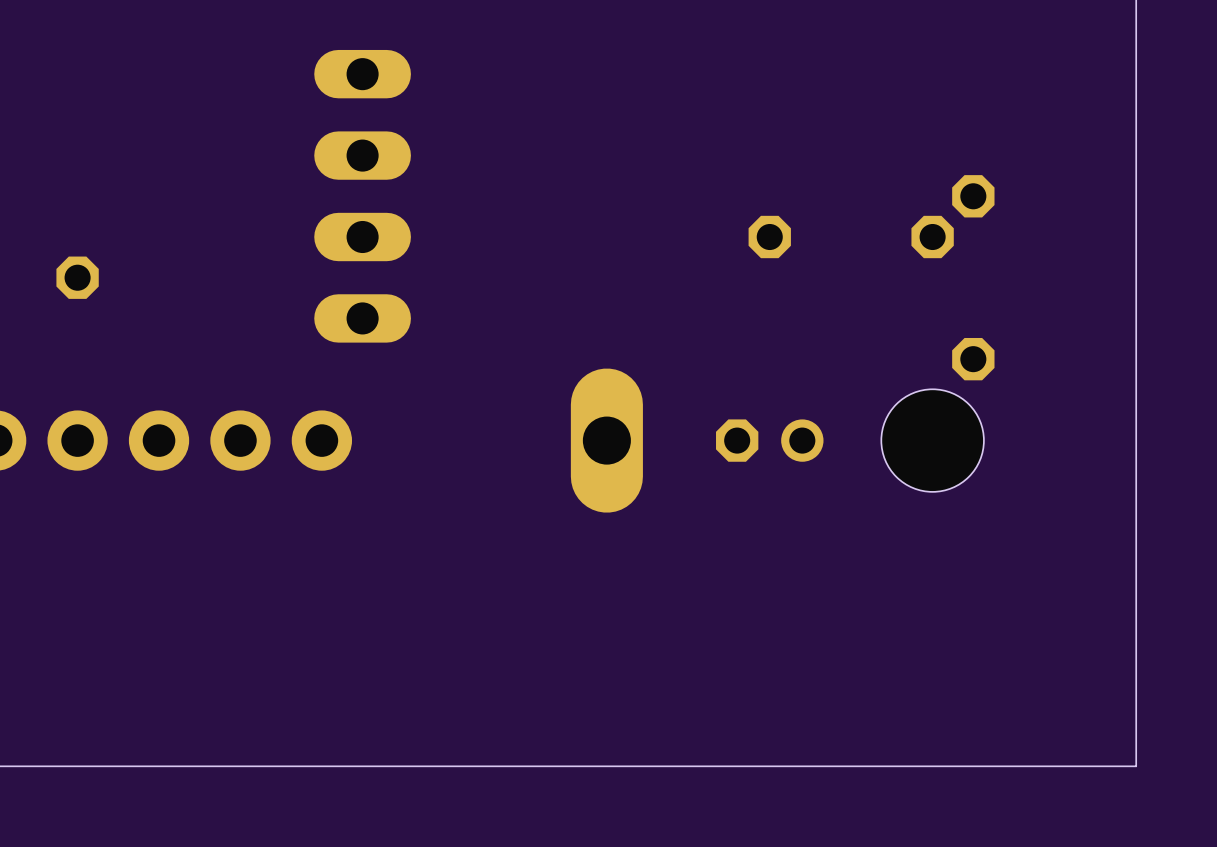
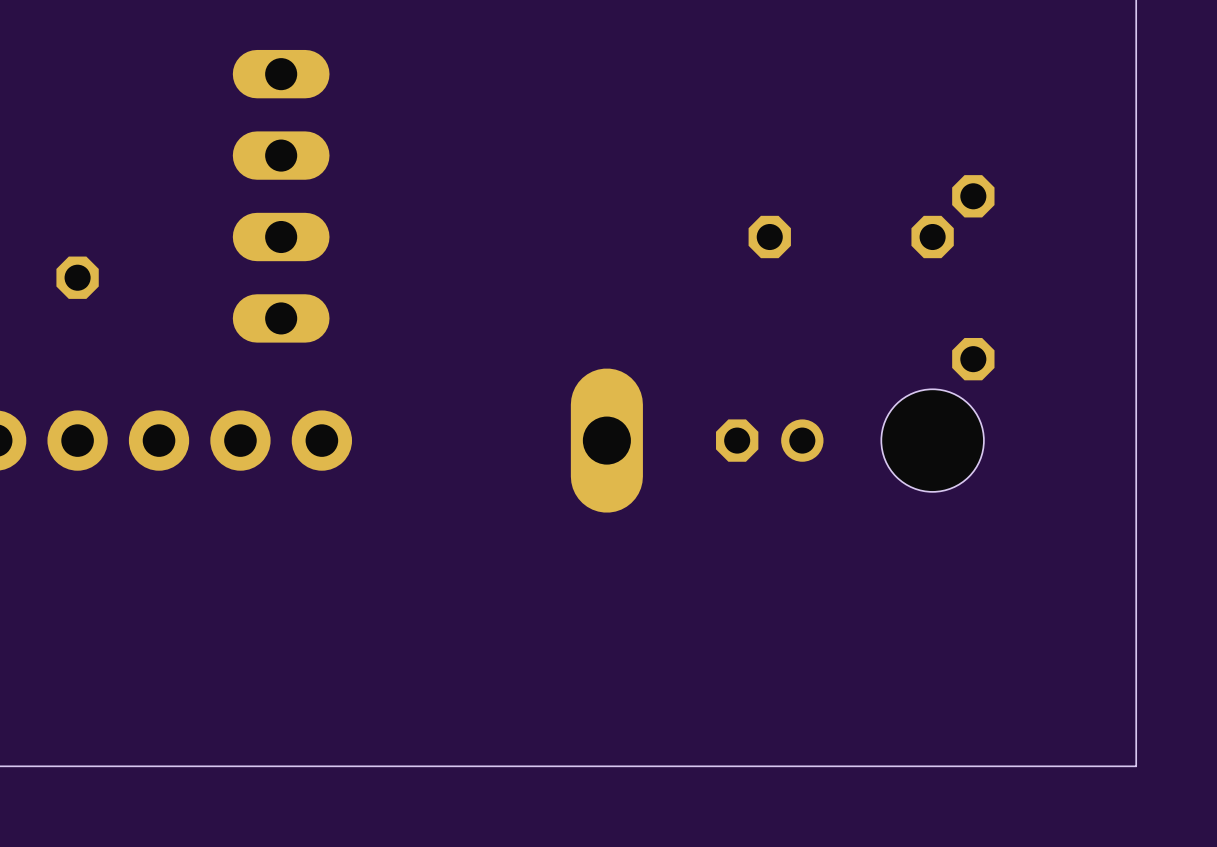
part position: (362, 114) -> (281, 114)
part position: (362, 277) -> (281, 277)

